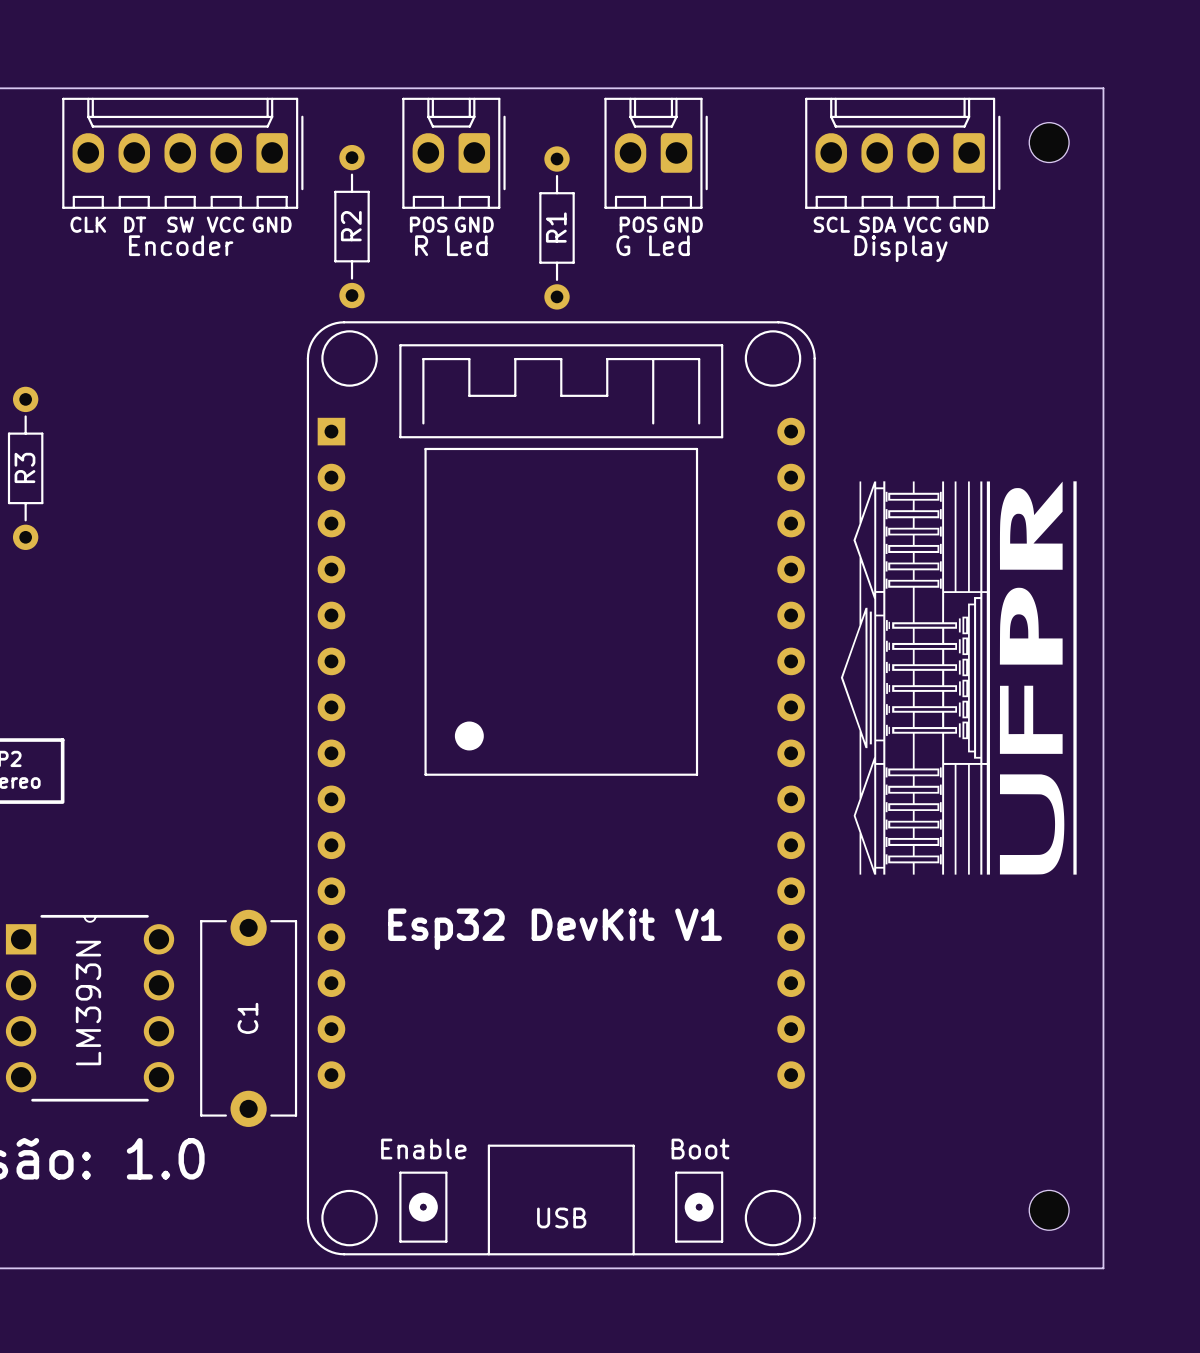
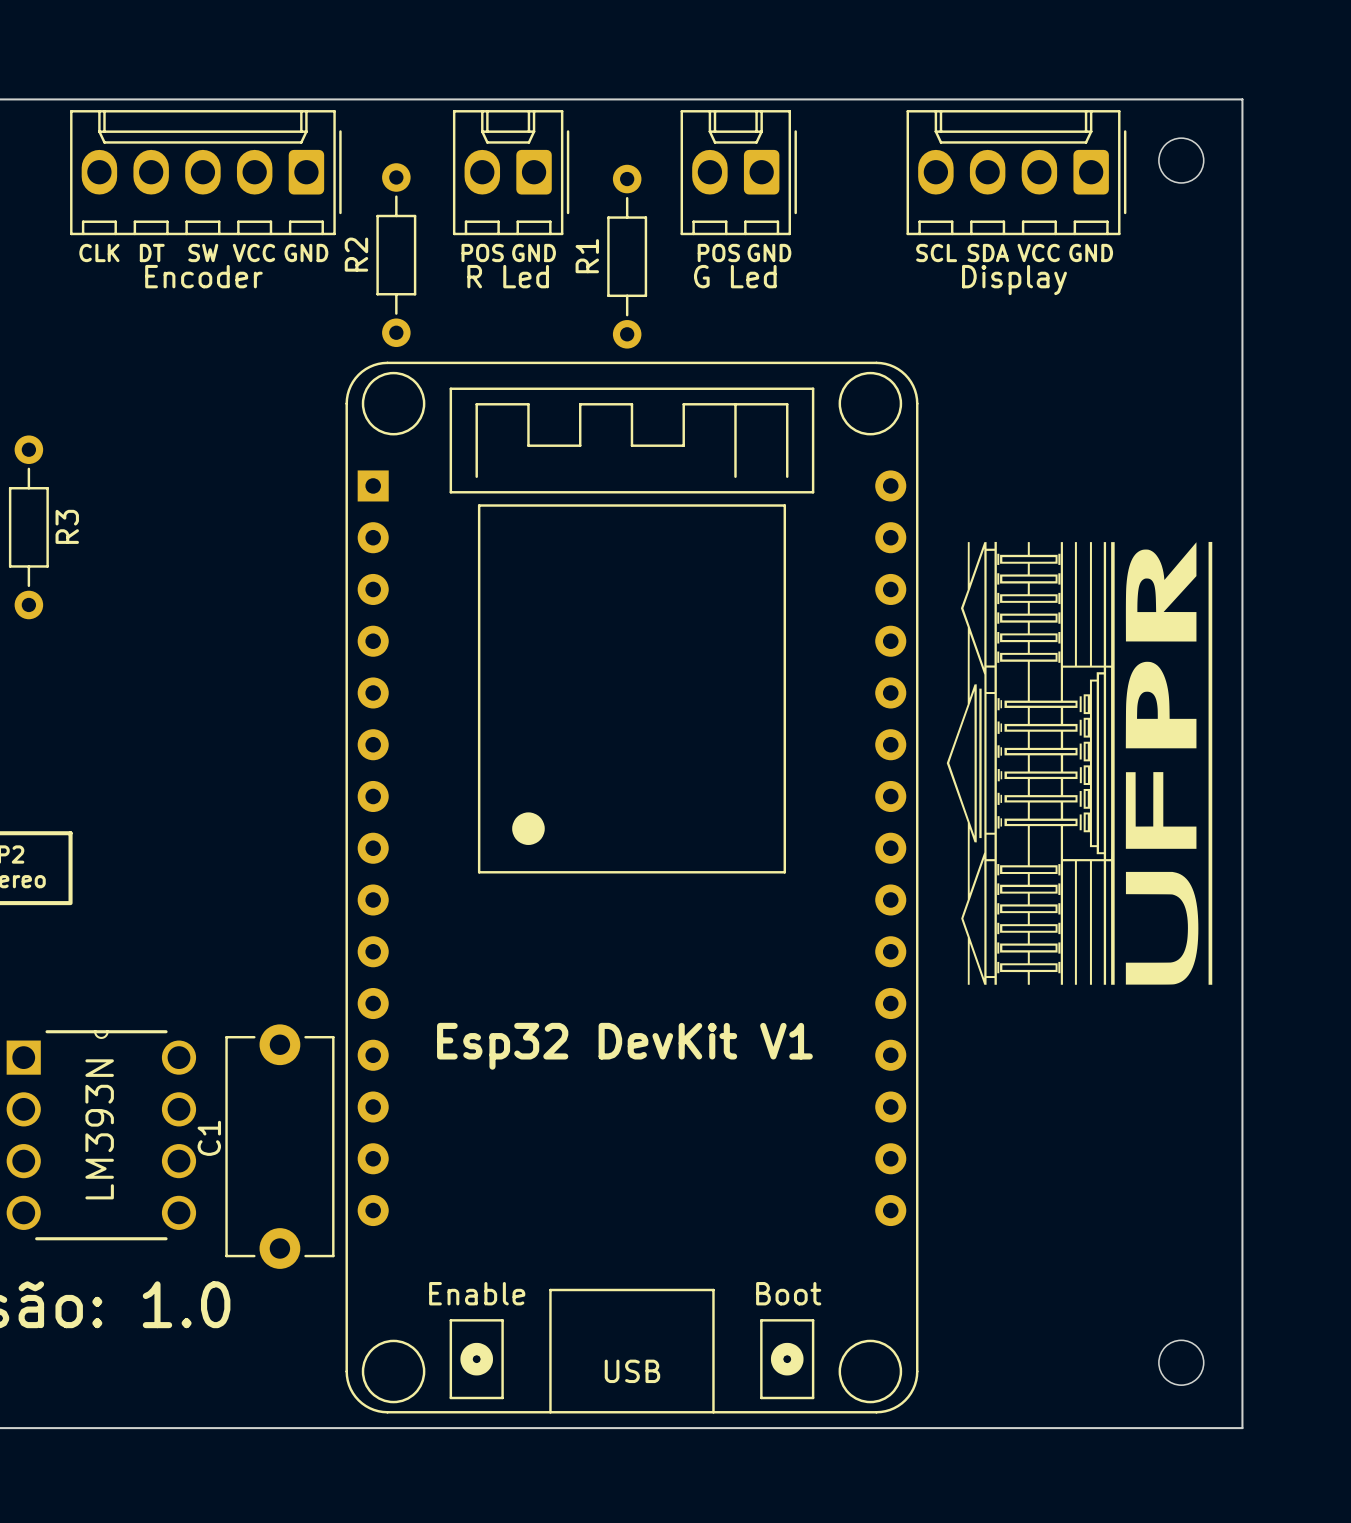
R2 name position: R2 (351, 226) -> R2 (356, 254)
R1 name position: R1 (556, 227) -> R1 (587, 256)
R3 name position: R3 (24, 467) -> R3 (67, 526)
C1 name position: C1 (247, 1018) -> C1 (209, 1138)

